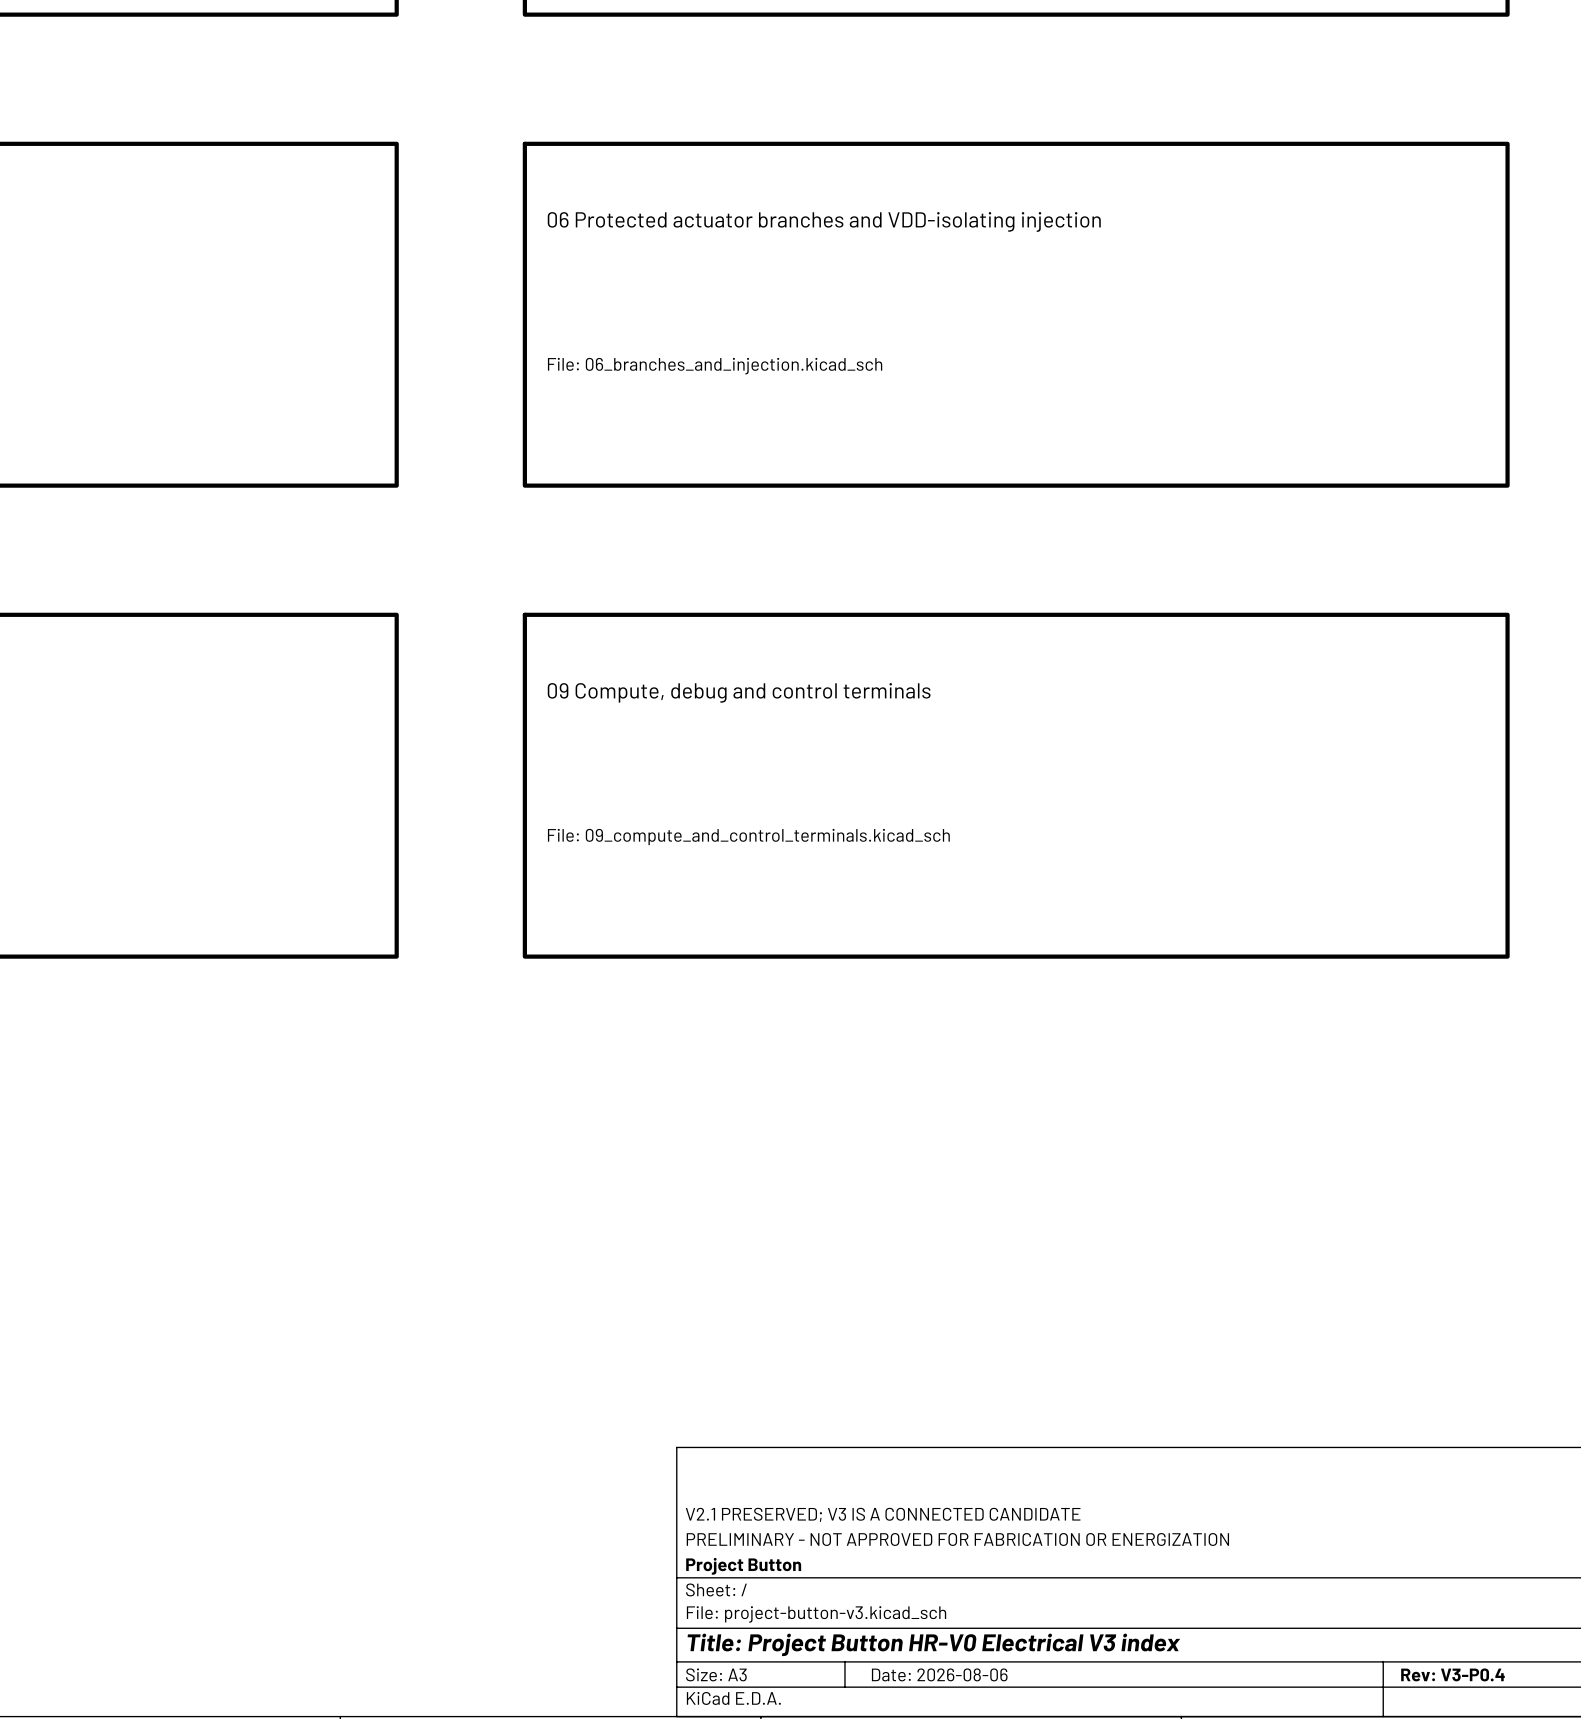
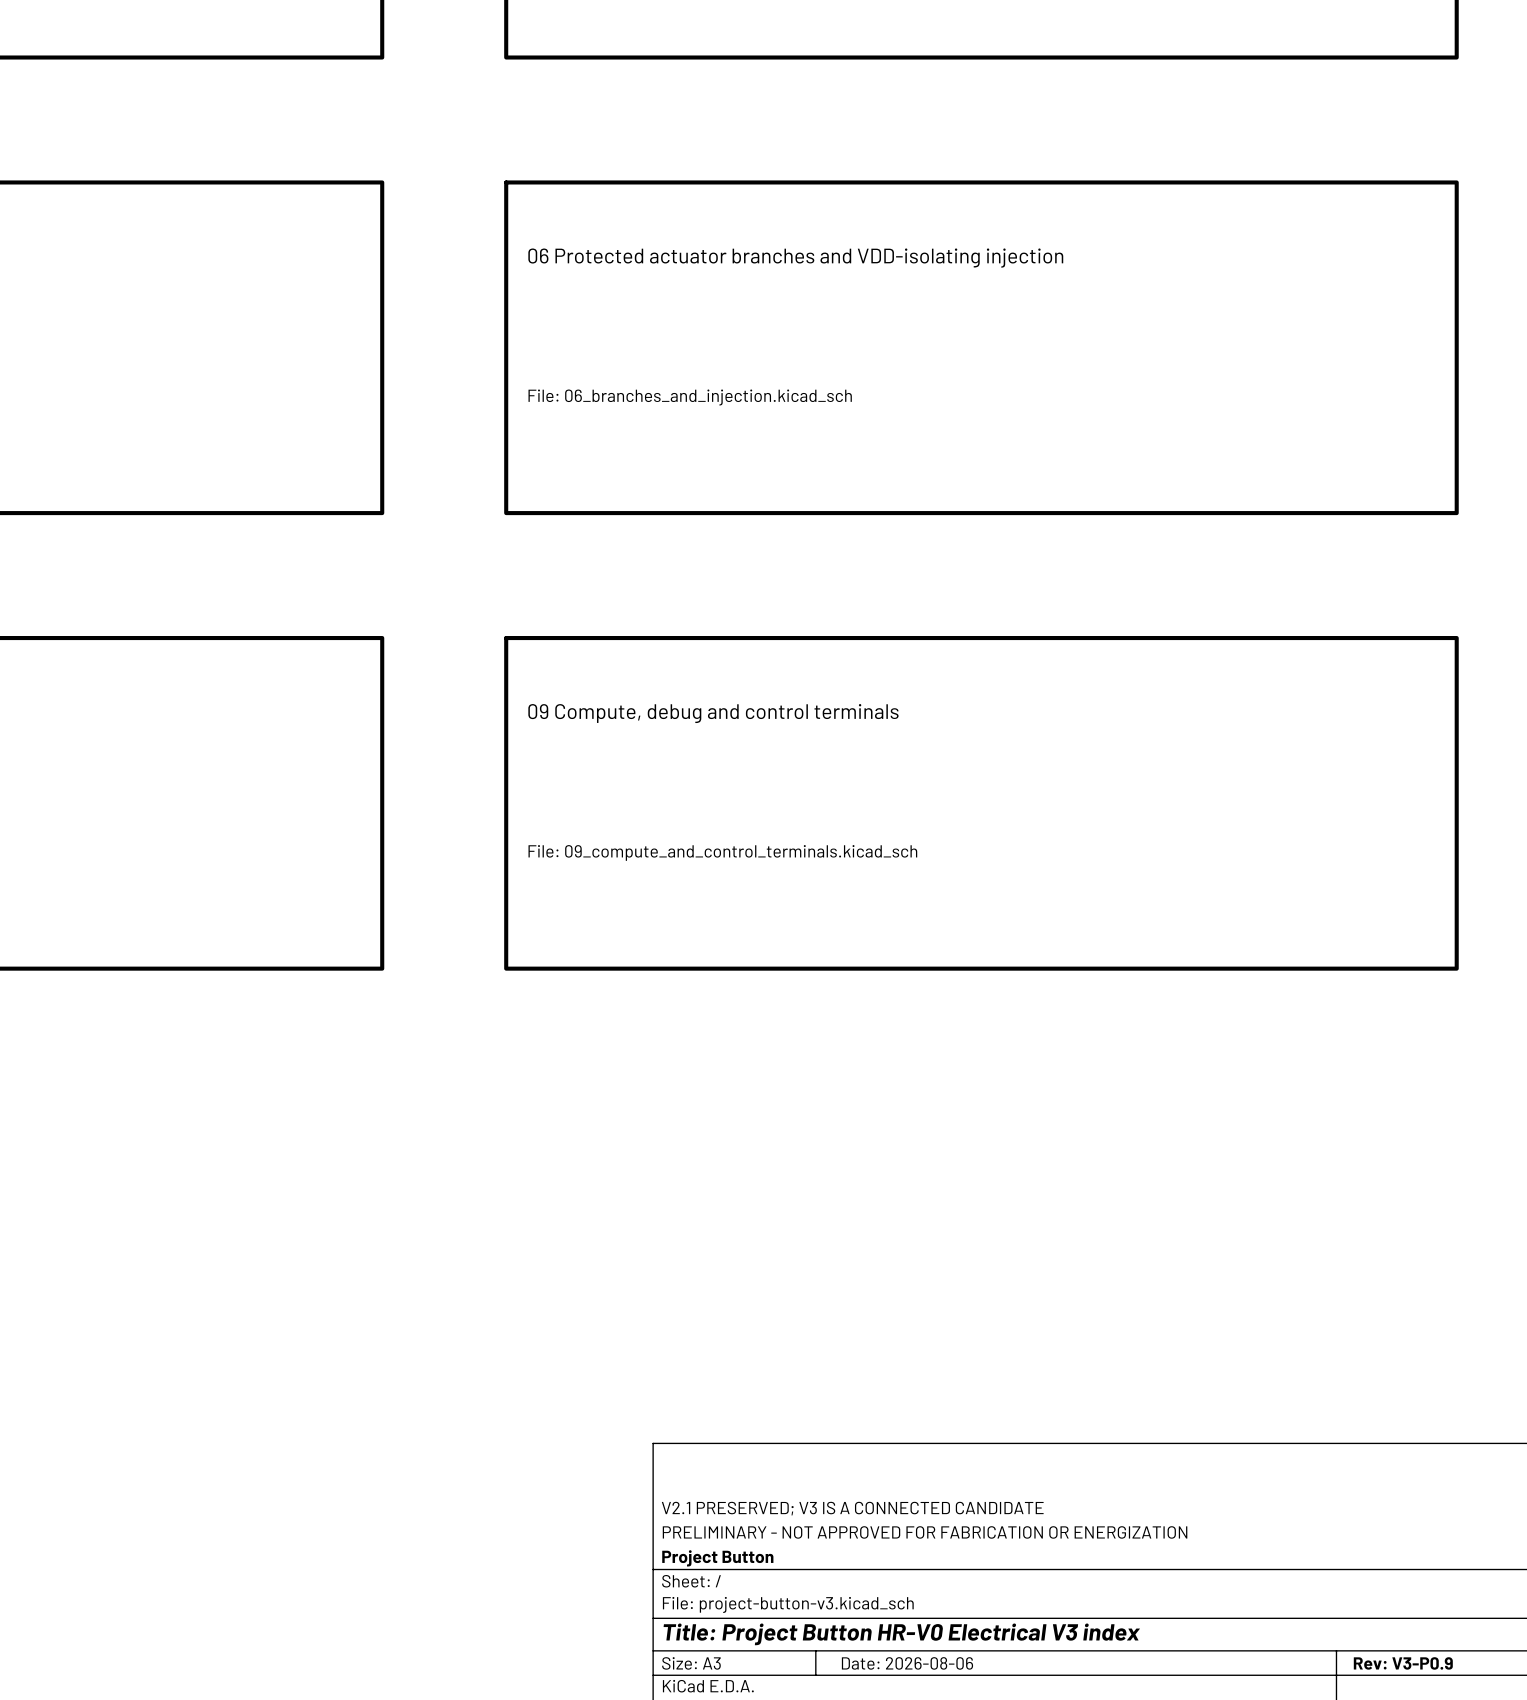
title block: Rev: V3-P0.4 (1452, 1674) -> Rev: V3-P0.9 (1403, 1663)

